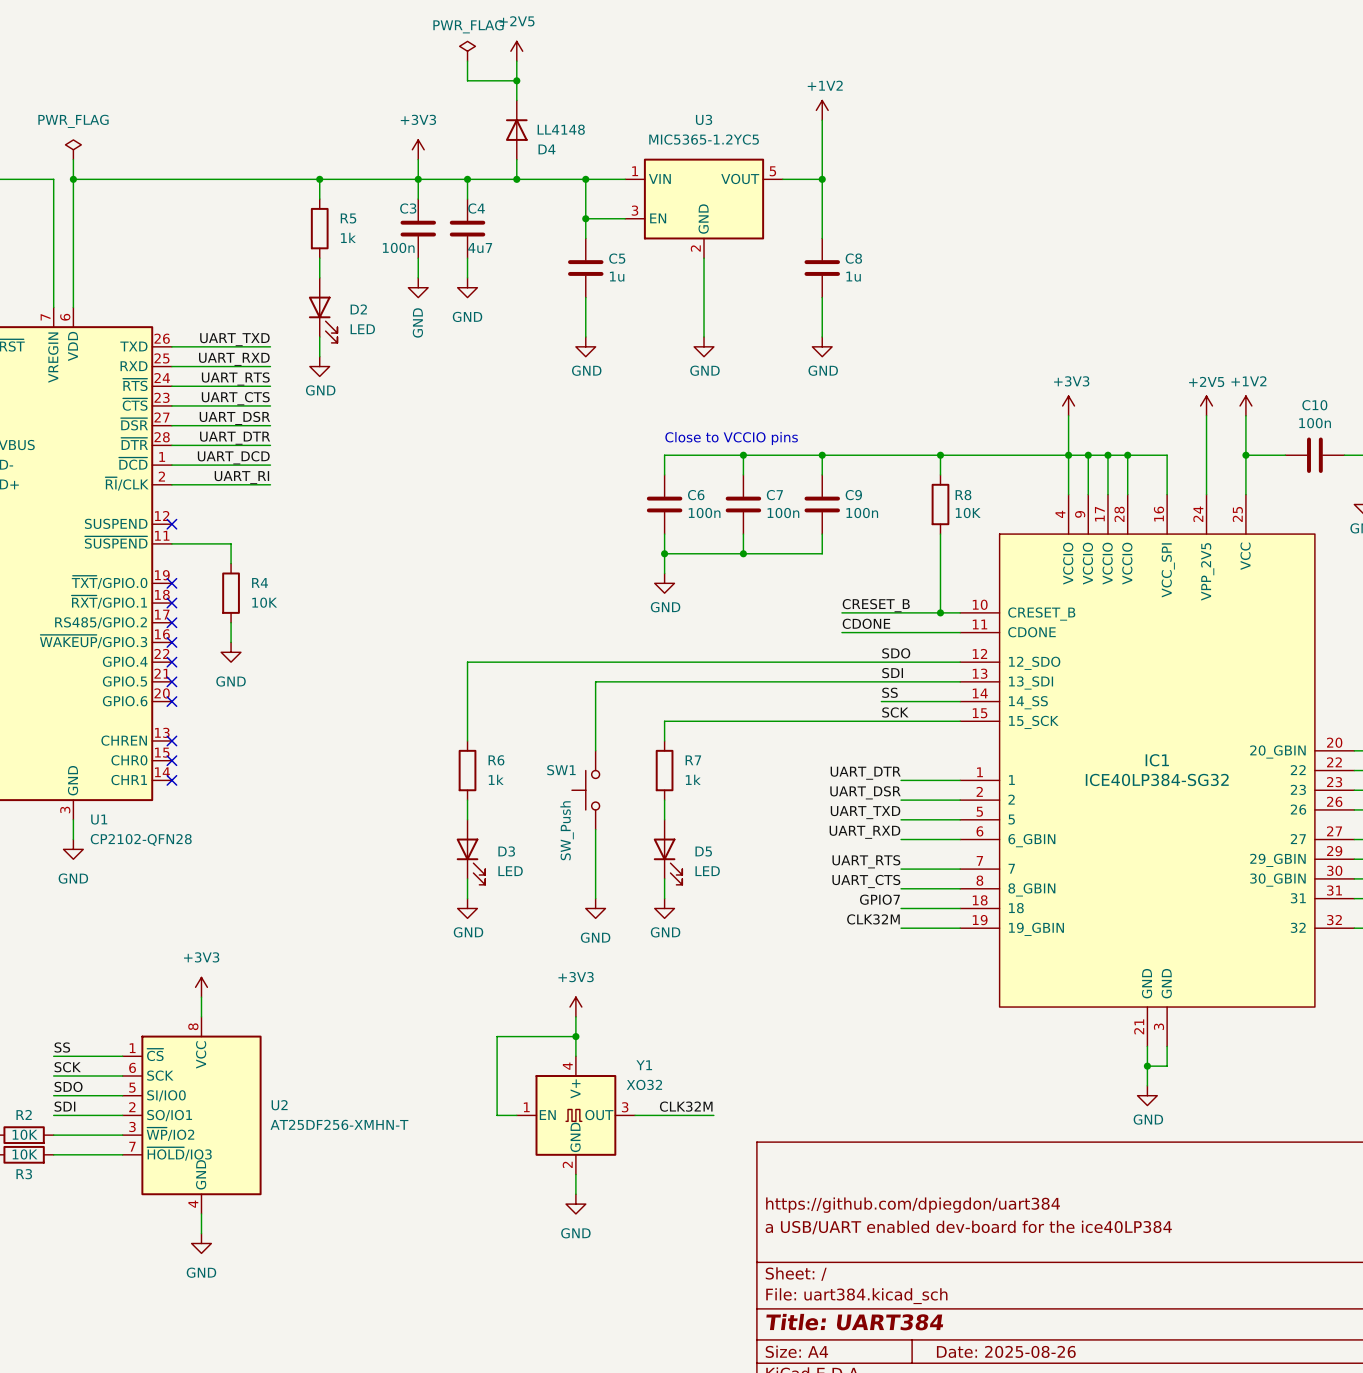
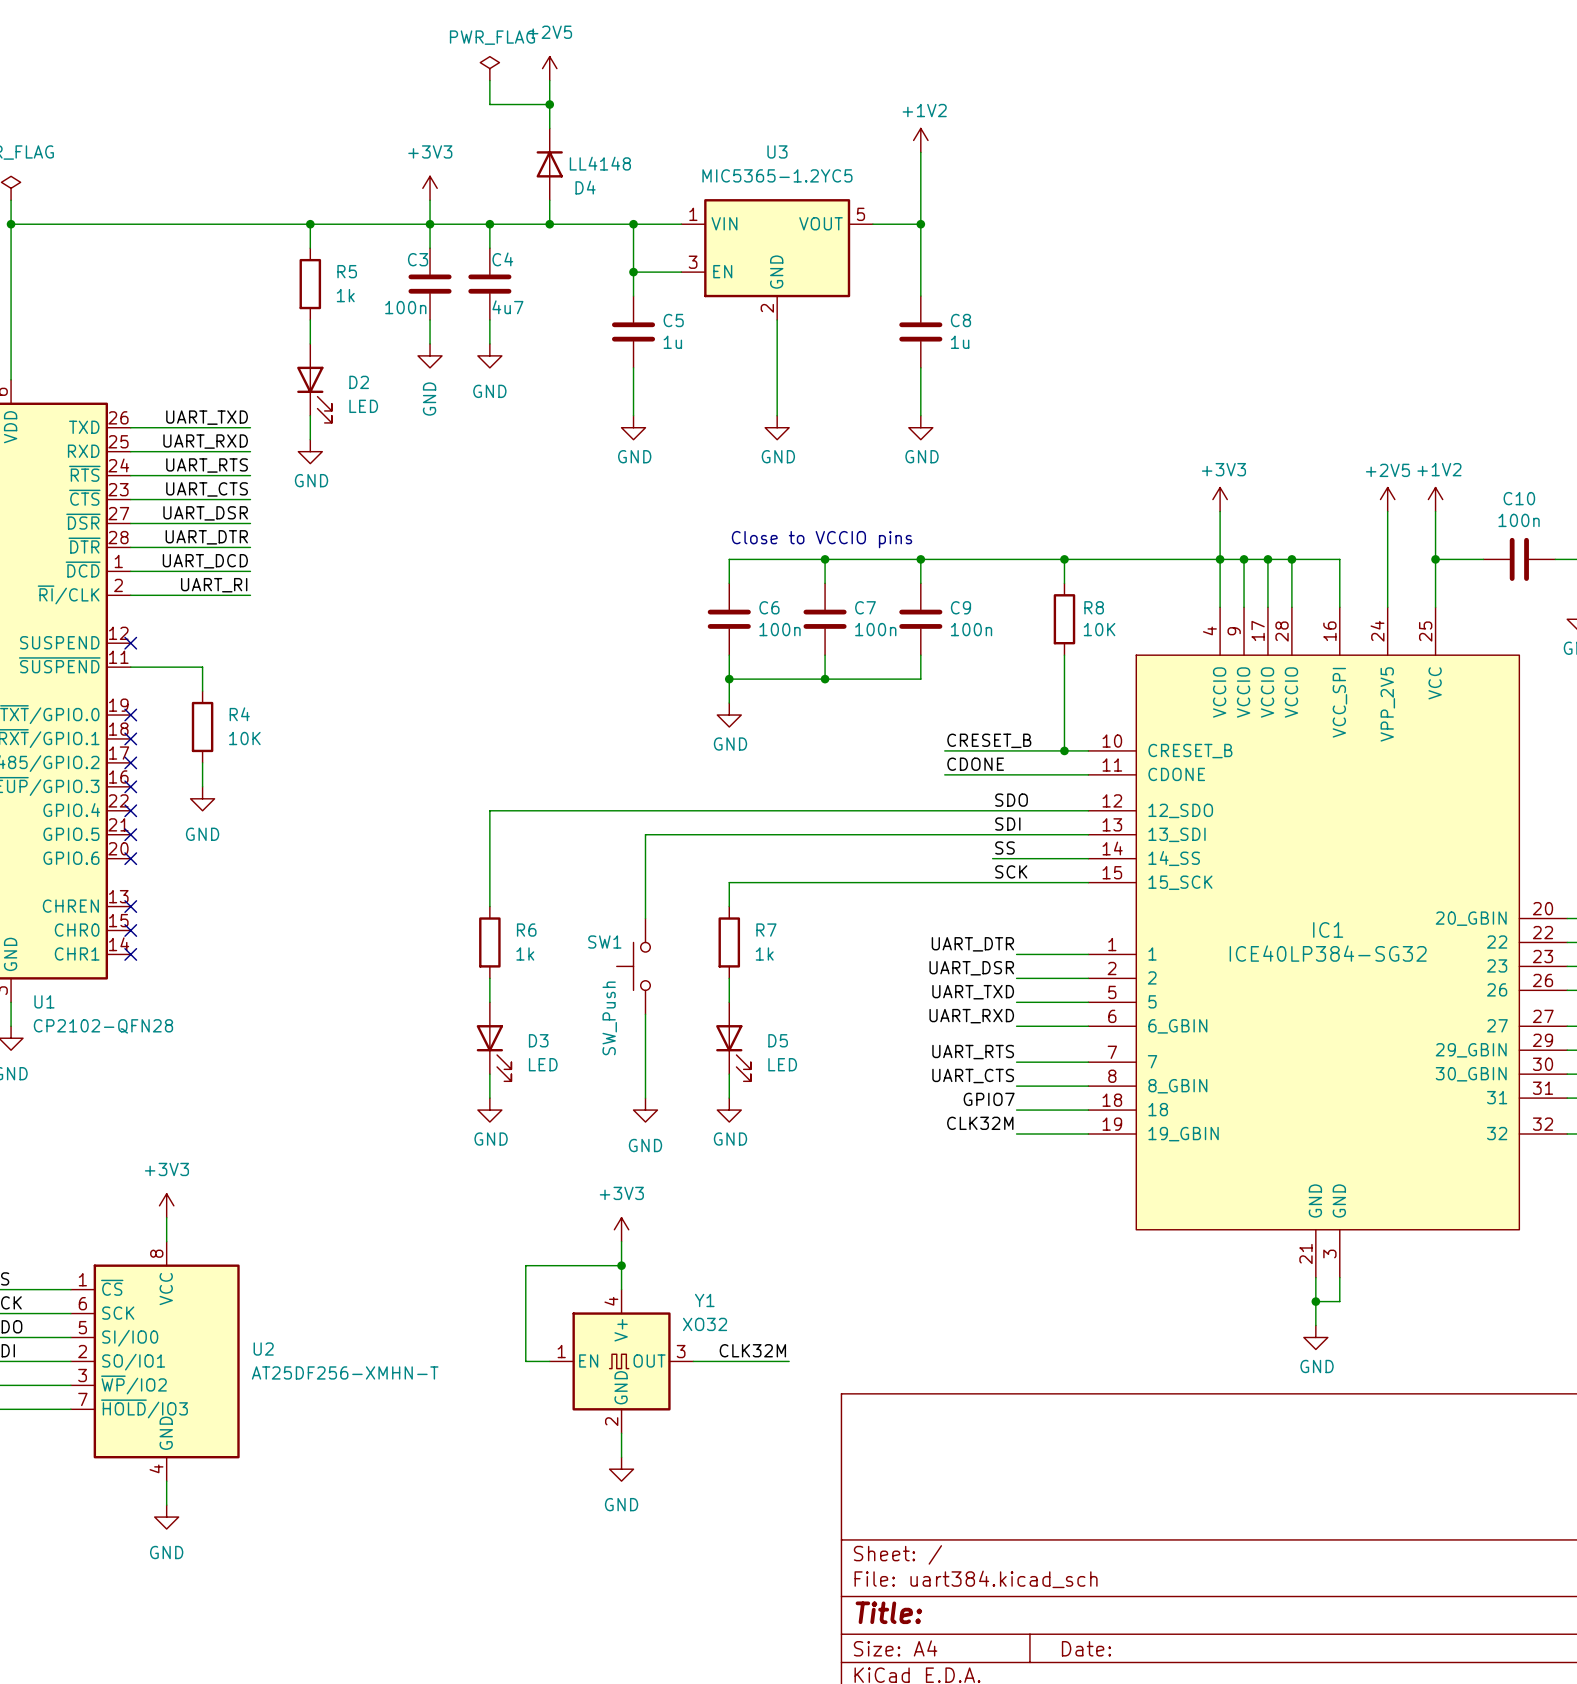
title block: https://github.com/dpiegdon/uart384 (913, 1205) -> none
title block: a USB/UART enabled dev-board for the ice40LP384 (968, 1227) -> none
title block: Title: UART384 (854, 1322) -> Title: (888, 1612)
title block: Date: 2025-08-26 (1006, 1351) -> Date: (1086, 1648)

